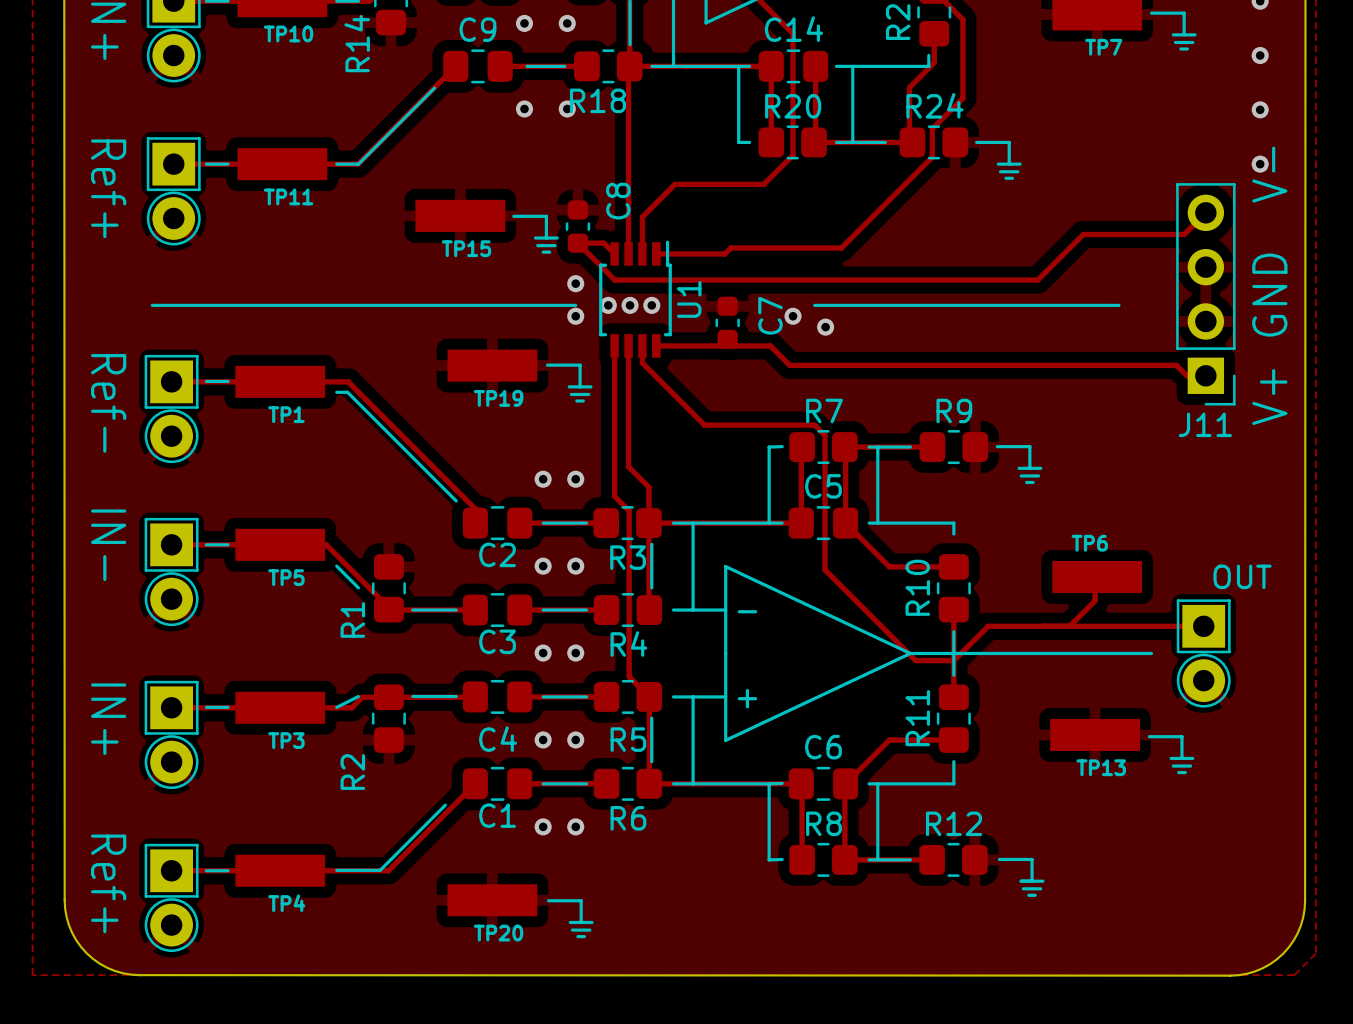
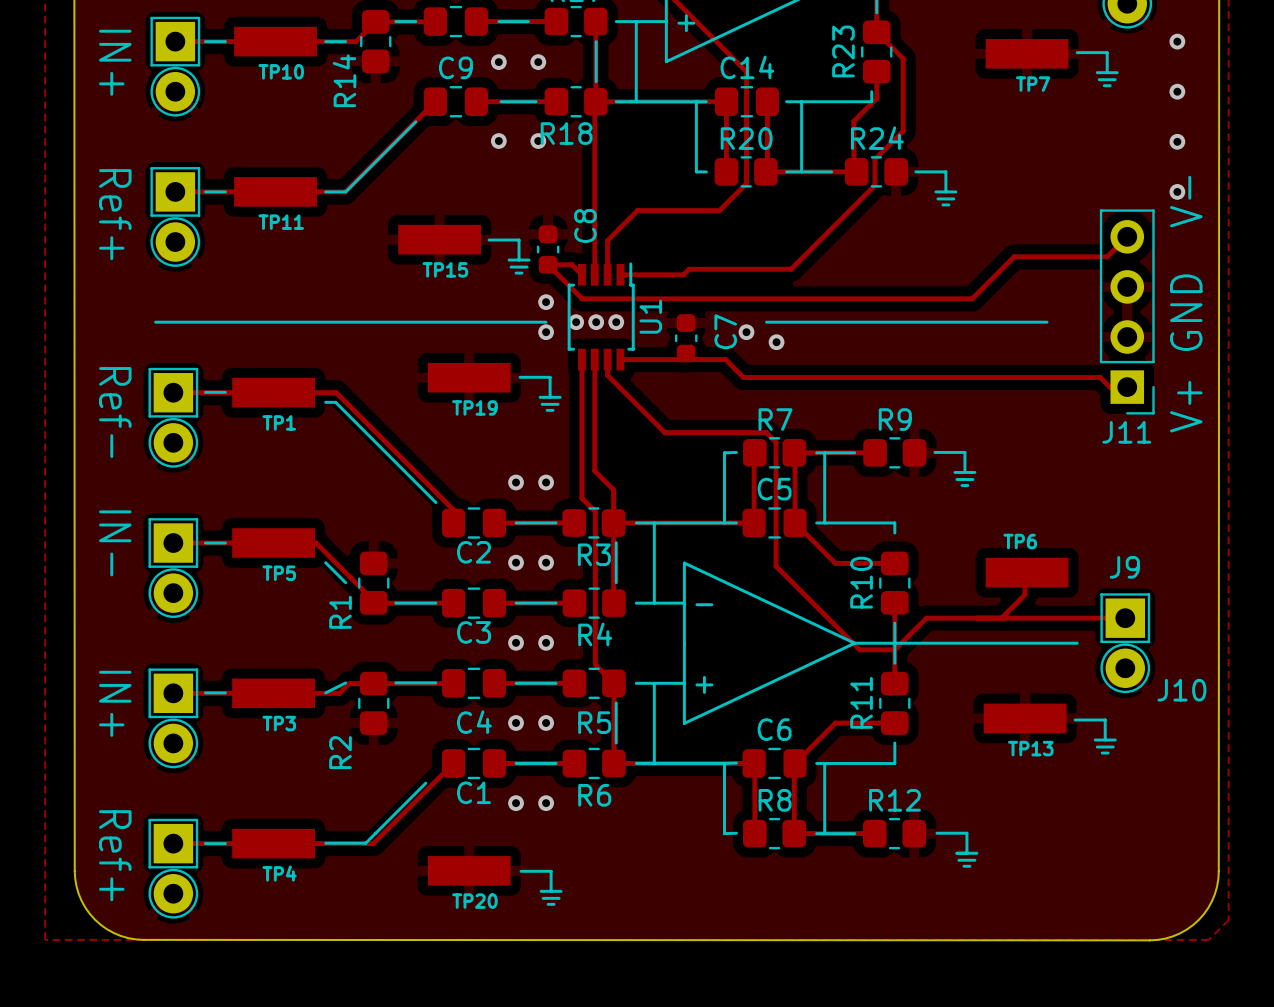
J9 name: none -> J9 (1124, 567)
text: OUT (1242, 576) -> none
J10 name: none -> J10 (1181, 690)

